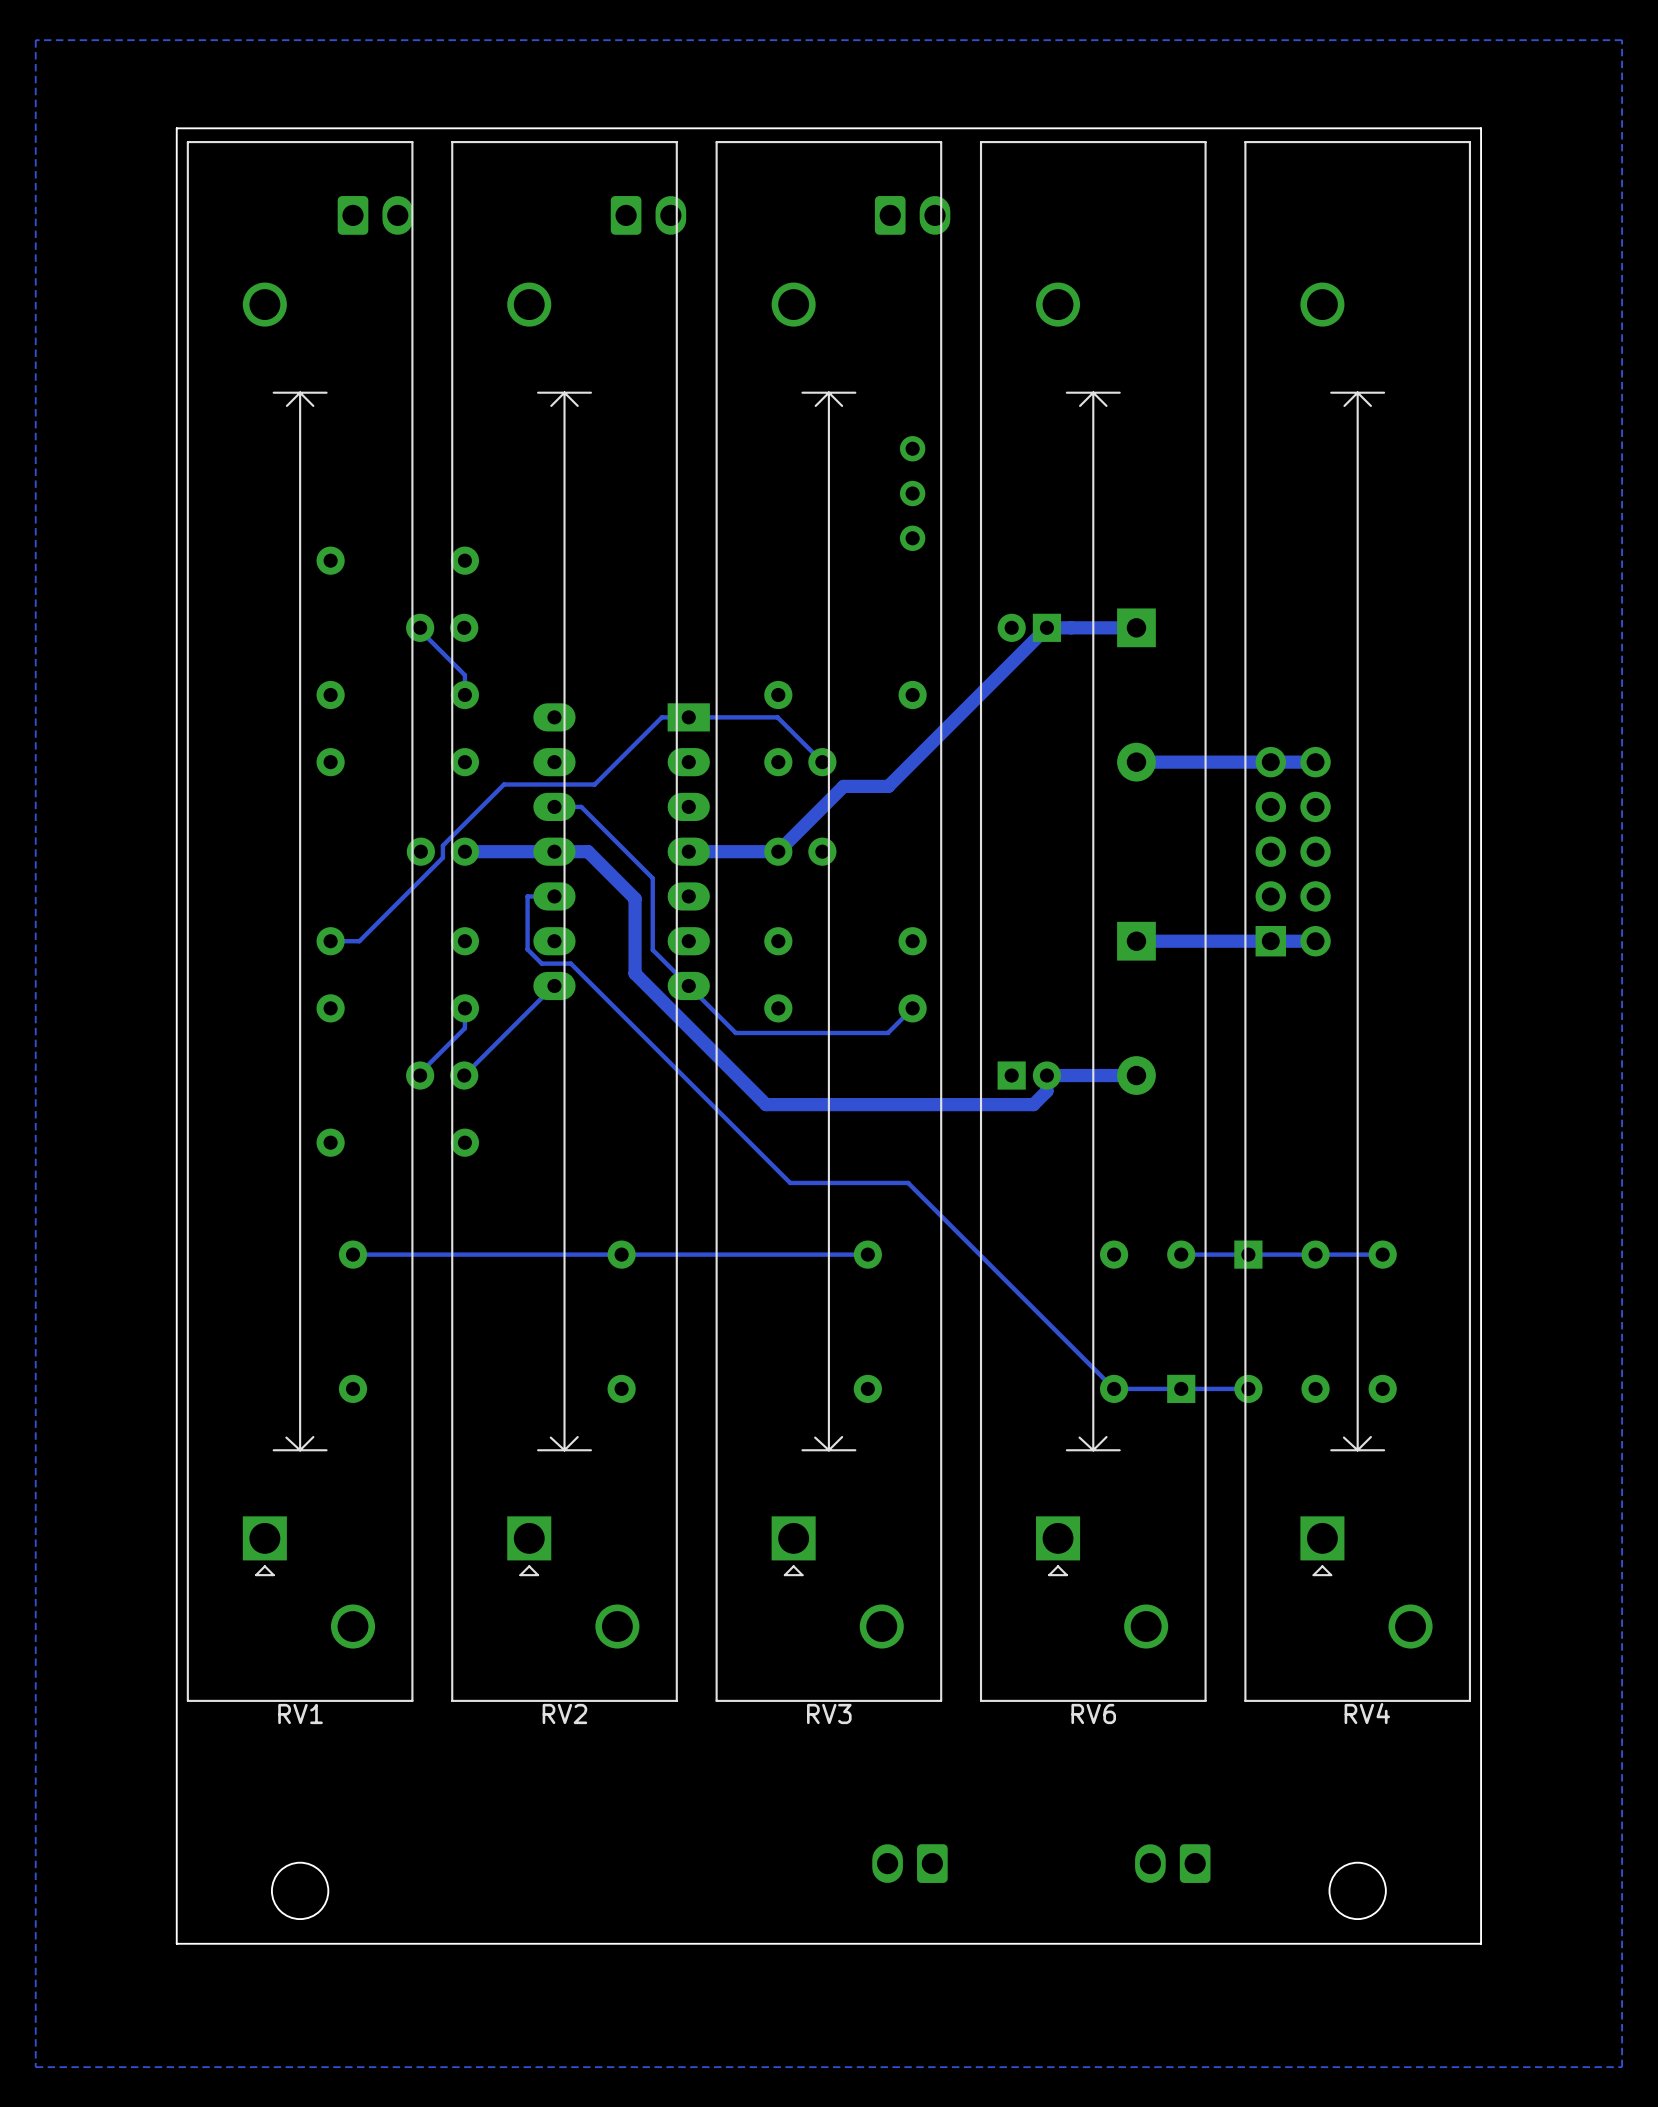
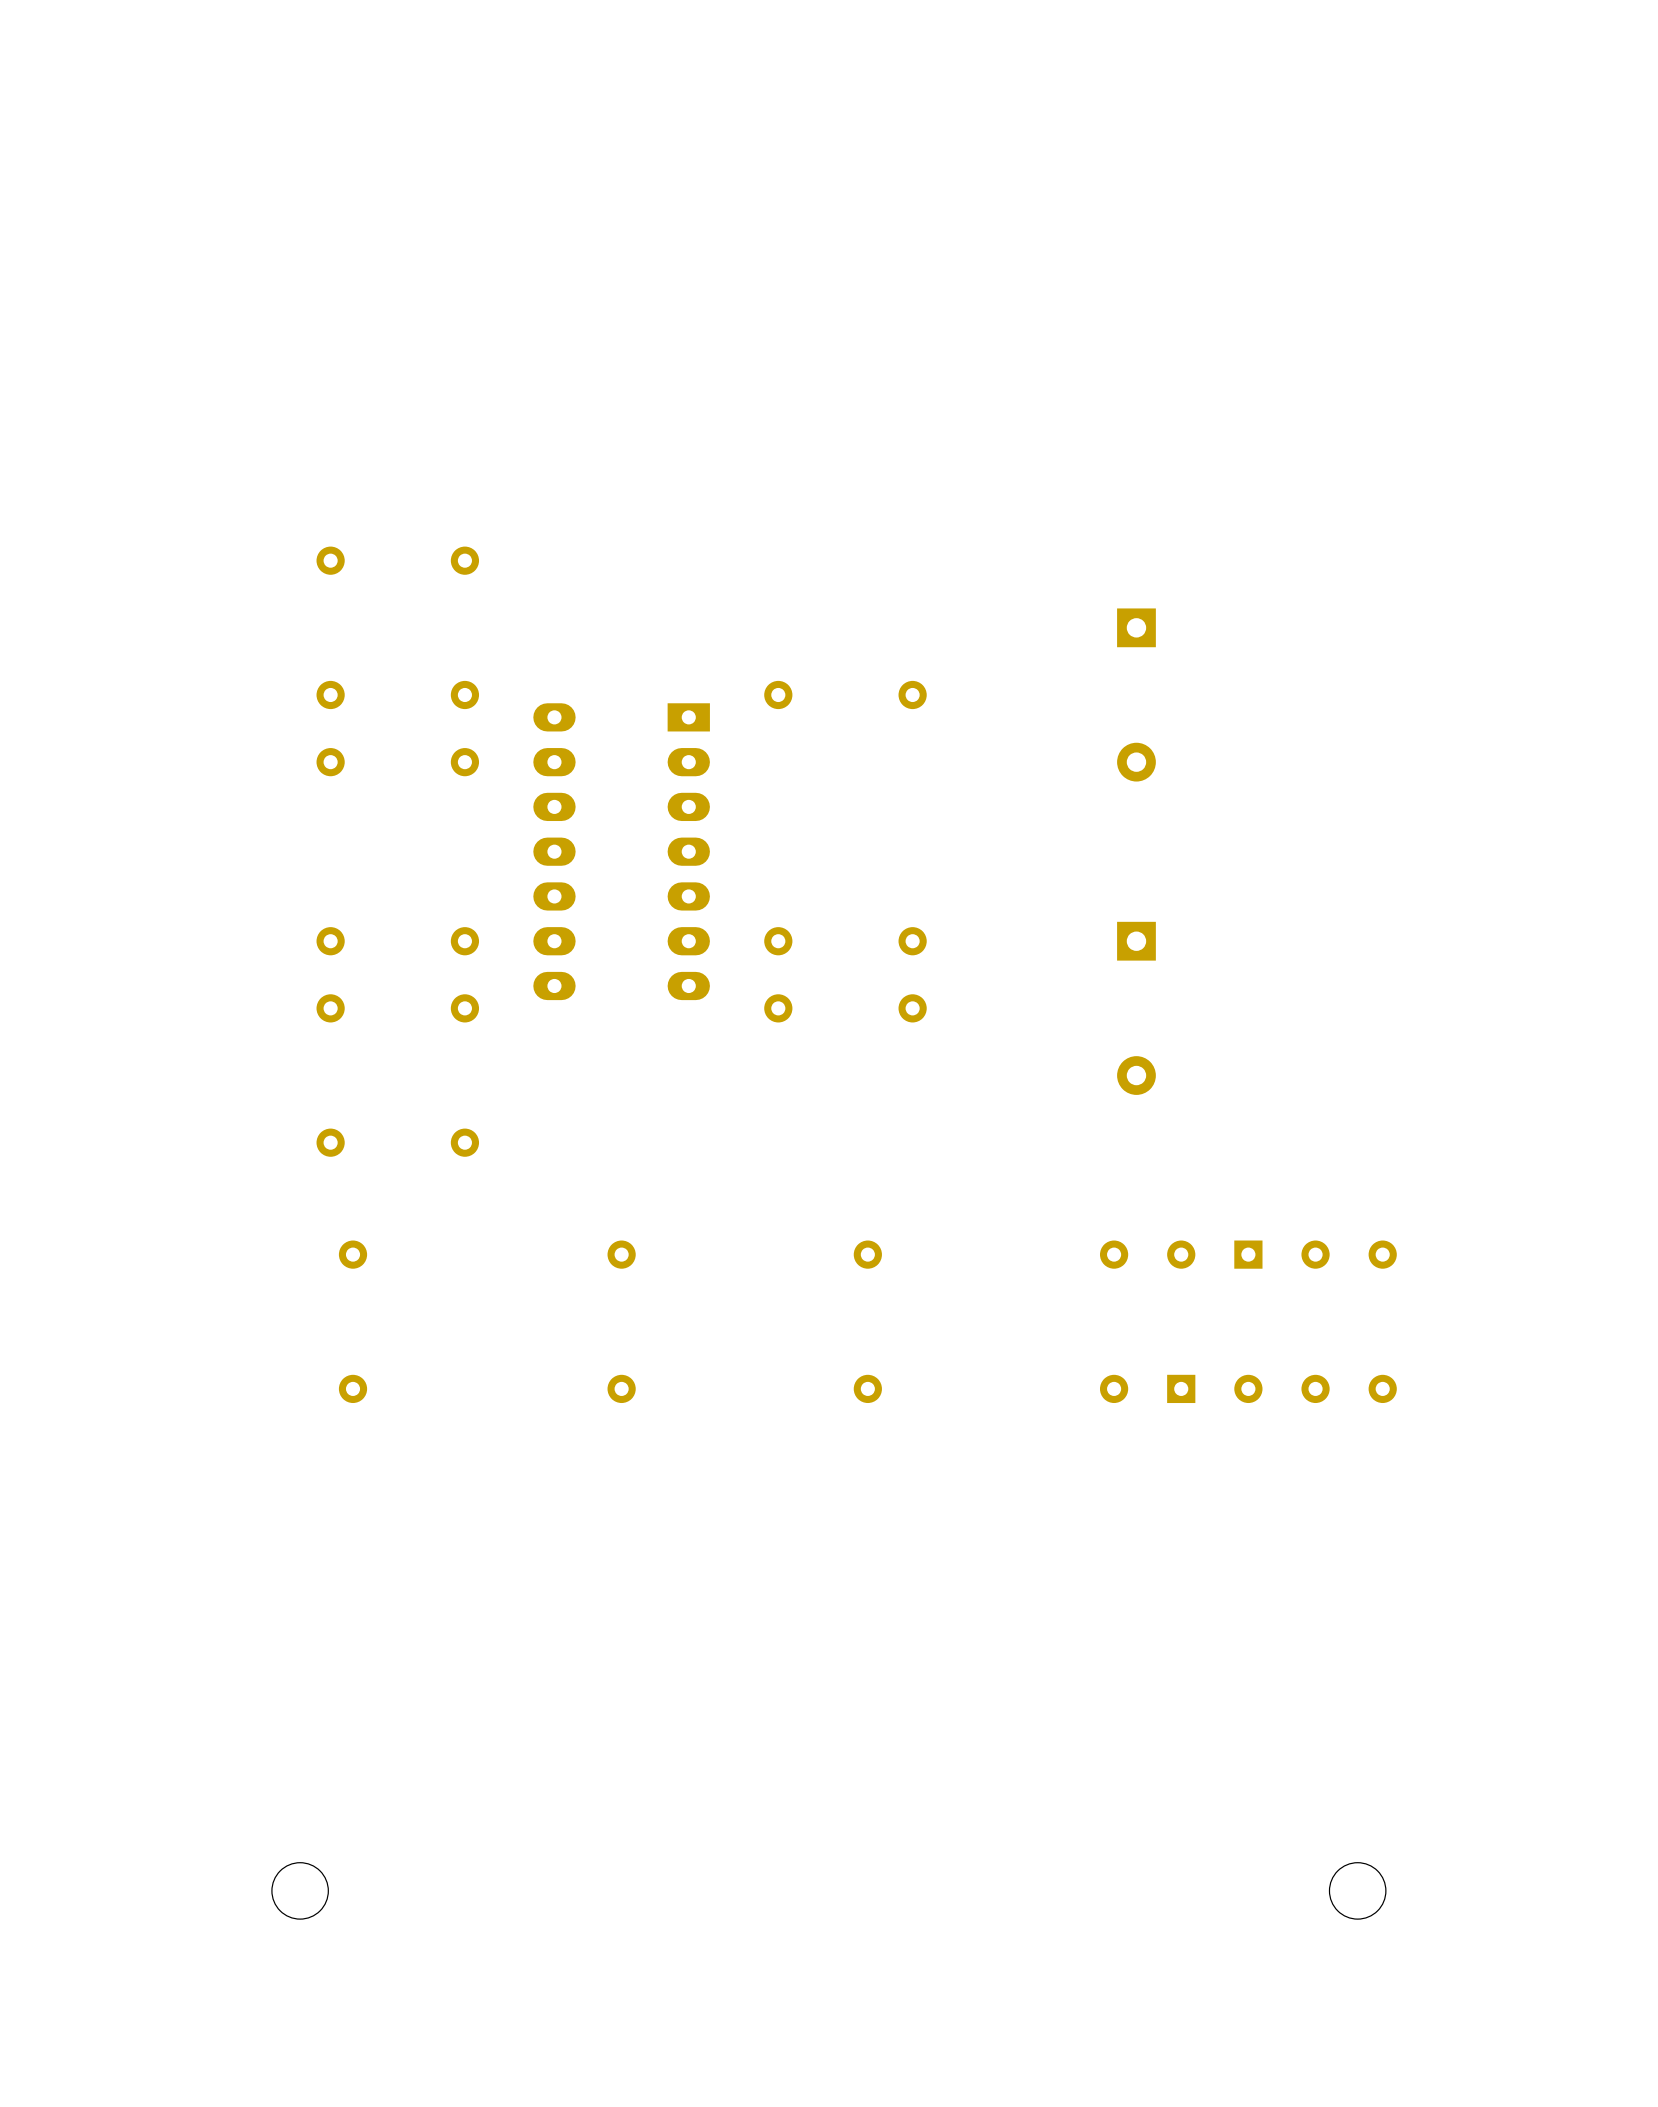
zone outline: (1622, 40) (1622, 2067) (35, 2067) (35, 40) (1622, 40) -> none
board edge: (1481, 128) (1481, 1943) (176, 1943) (176, 128) (1481, 128) -> none
part: (375, 215) -> none
part: (648, 215) -> none
part: (912, 215) -> none
part: (912, 493) -> none
track: (420, 627) (420, 630) (464, 675) (464, 694) -> none
part: (442, 627) -> none
part: (1029, 627) -> none
track: (1136, 627) (1046, 627) (888, 786) (843, 786) (778, 851) (688, 851) -> none
part: (800, 762) -> none
track: (822, 762) (777, 717) (661, 717) (594, 784) (503, 784) (442, 845) (442, 857) (359, 941) (330, 941) -> none
track: (1315, 762) (1136, 762) -> none
track: (554, 806) (581, 806) (652, 878) (652, 949) (735, 1033) (888, 1033) (912, 1008) -> none
part: (442, 851) -> none
track: (464, 851) (588, 851) (635, 898) (635, 973) (766, 1104) (1033, 1104) (1046, 1091) (1046, 1075) (1136, 1075) -> none
part: (800, 851) -> none
part: (1293, 851) -> none
track: (554, 896) (527, 896) (527, 949) (541, 963) (570, 963) (790, 1182) (908, 1182) (1114, 1388) (1248, 1388) -> none
RV1: (300, 921) -> none
RV2: (564, 921) -> none
RV3: (828, 921) -> none
RV6: (1093, 921) -> none
RV4: (1357, 921) -> none
track: (1315, 941) (1136, 941) -> none
track: (553, 985) (464, 1075) -> none
track: (464, 1008) (464, 1028) (420, 1072) (420, 1075) -> none
part: (442, 1075) -> none
part: (1029, 1075) -> none
track: (867, 1254) (353, 1254) -> none
track: (1382, 1254) (1181, 1254) -> none
part: (909, 1863) -> none
part: (1172, 1863) -> none

